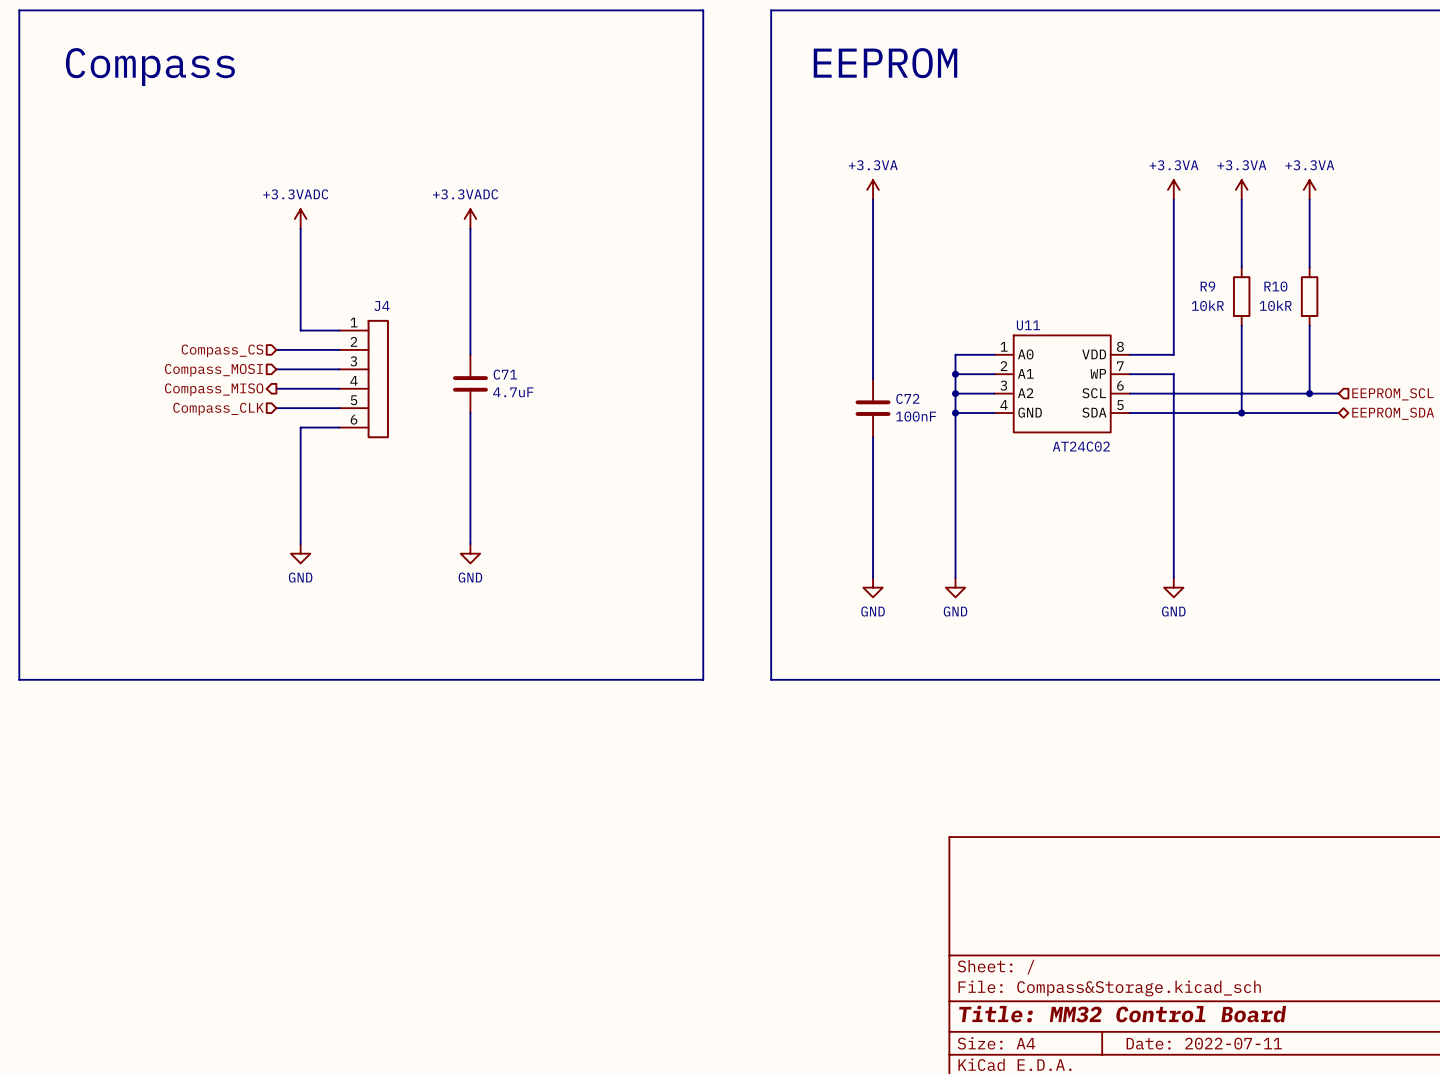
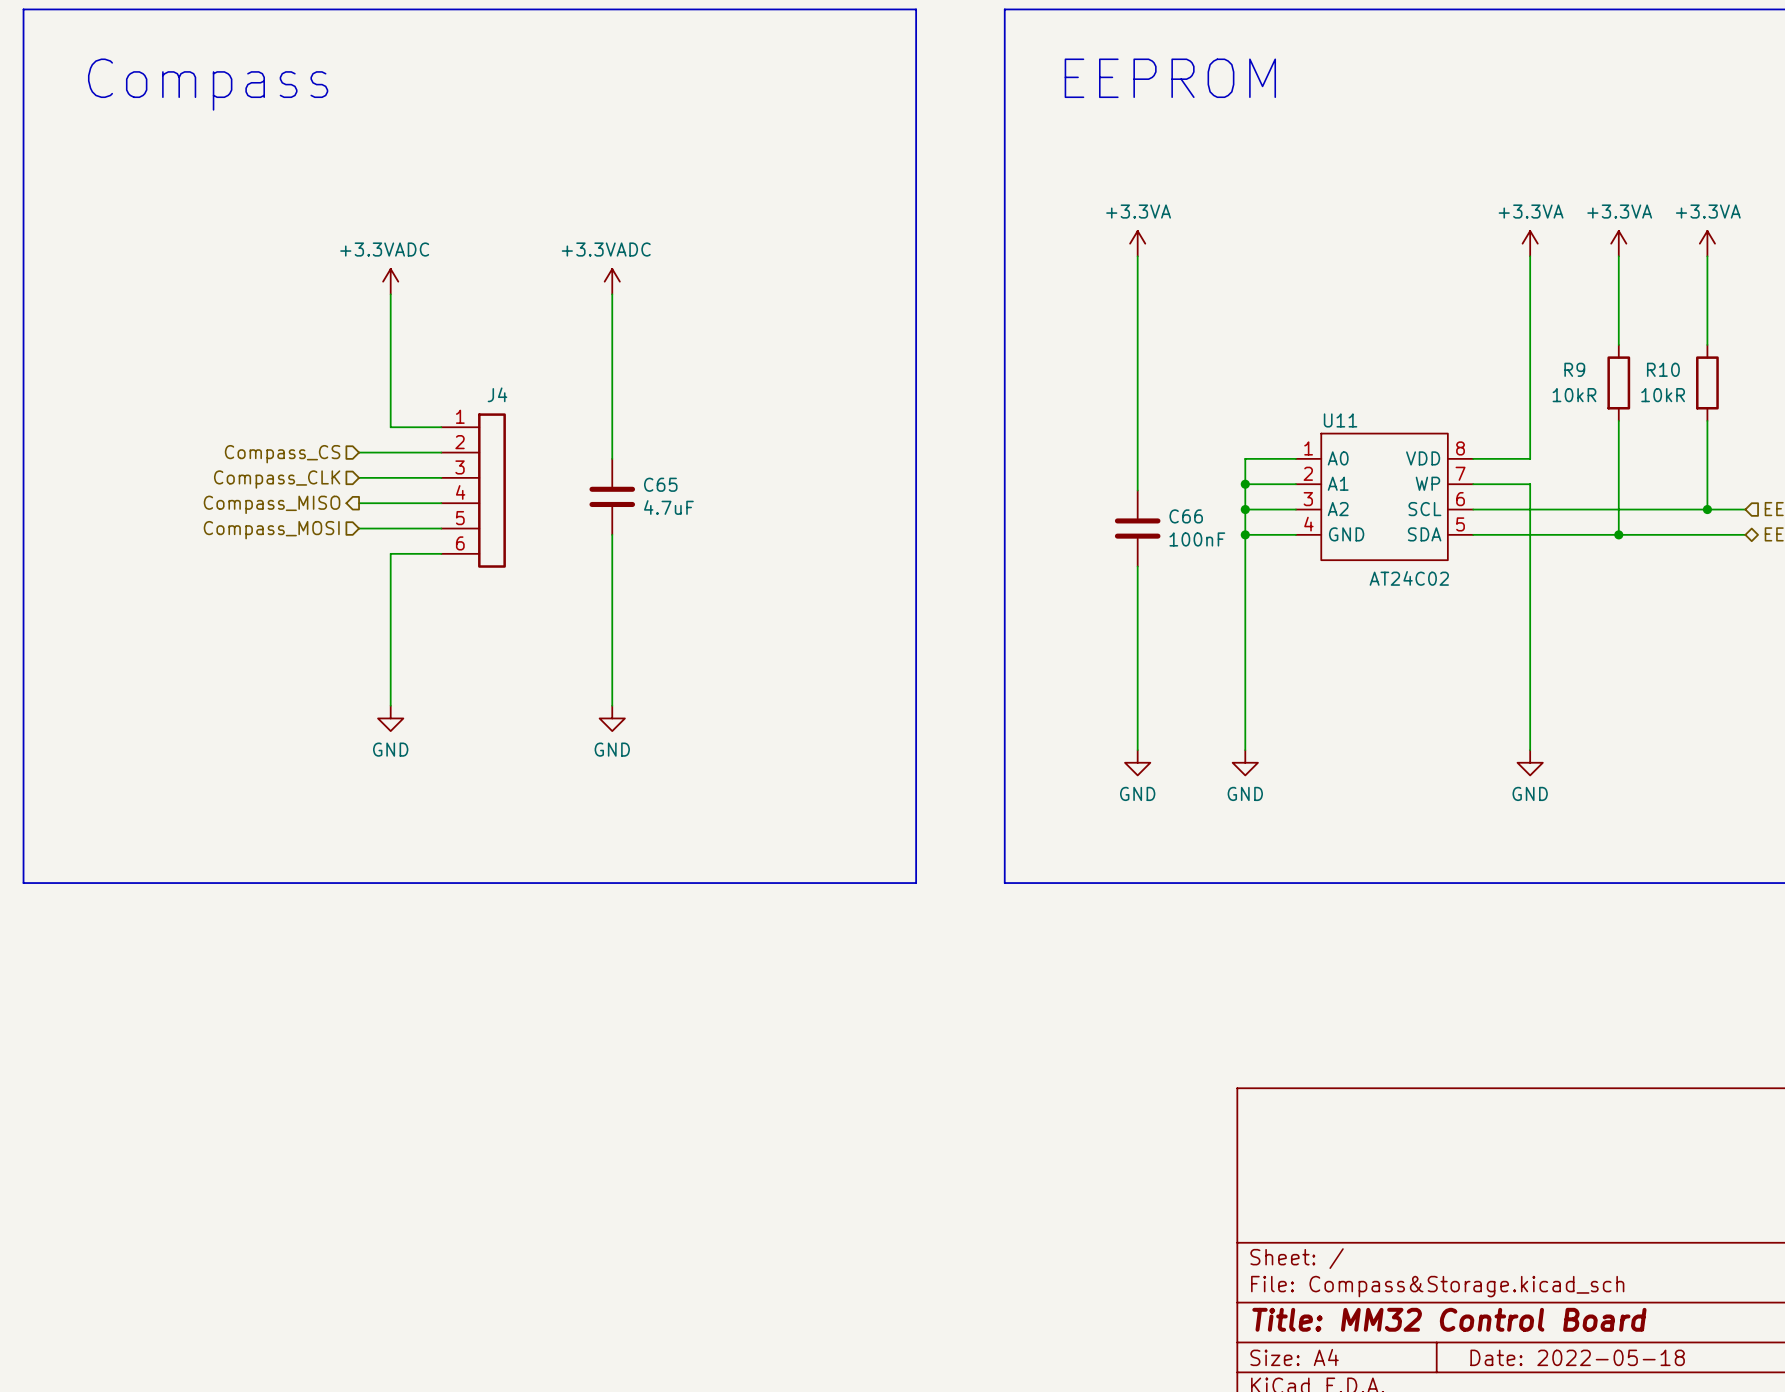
hierarchical label: Compass_MOSI (213, 370) -> Compass_CLK (277, 479)
C71 name: C71 (505, 374) -> C65 (660, 484)
C72 name: C72 (907, 398) -> C66 (1186, 516)
hierarchical label: Compass_CLK (218, 409) -> Compass_MOSI (271, 530)
title block: Date: 2022-07-11 (1204, 1043) -> Date: 2022-05-18 (1577, 1357)

